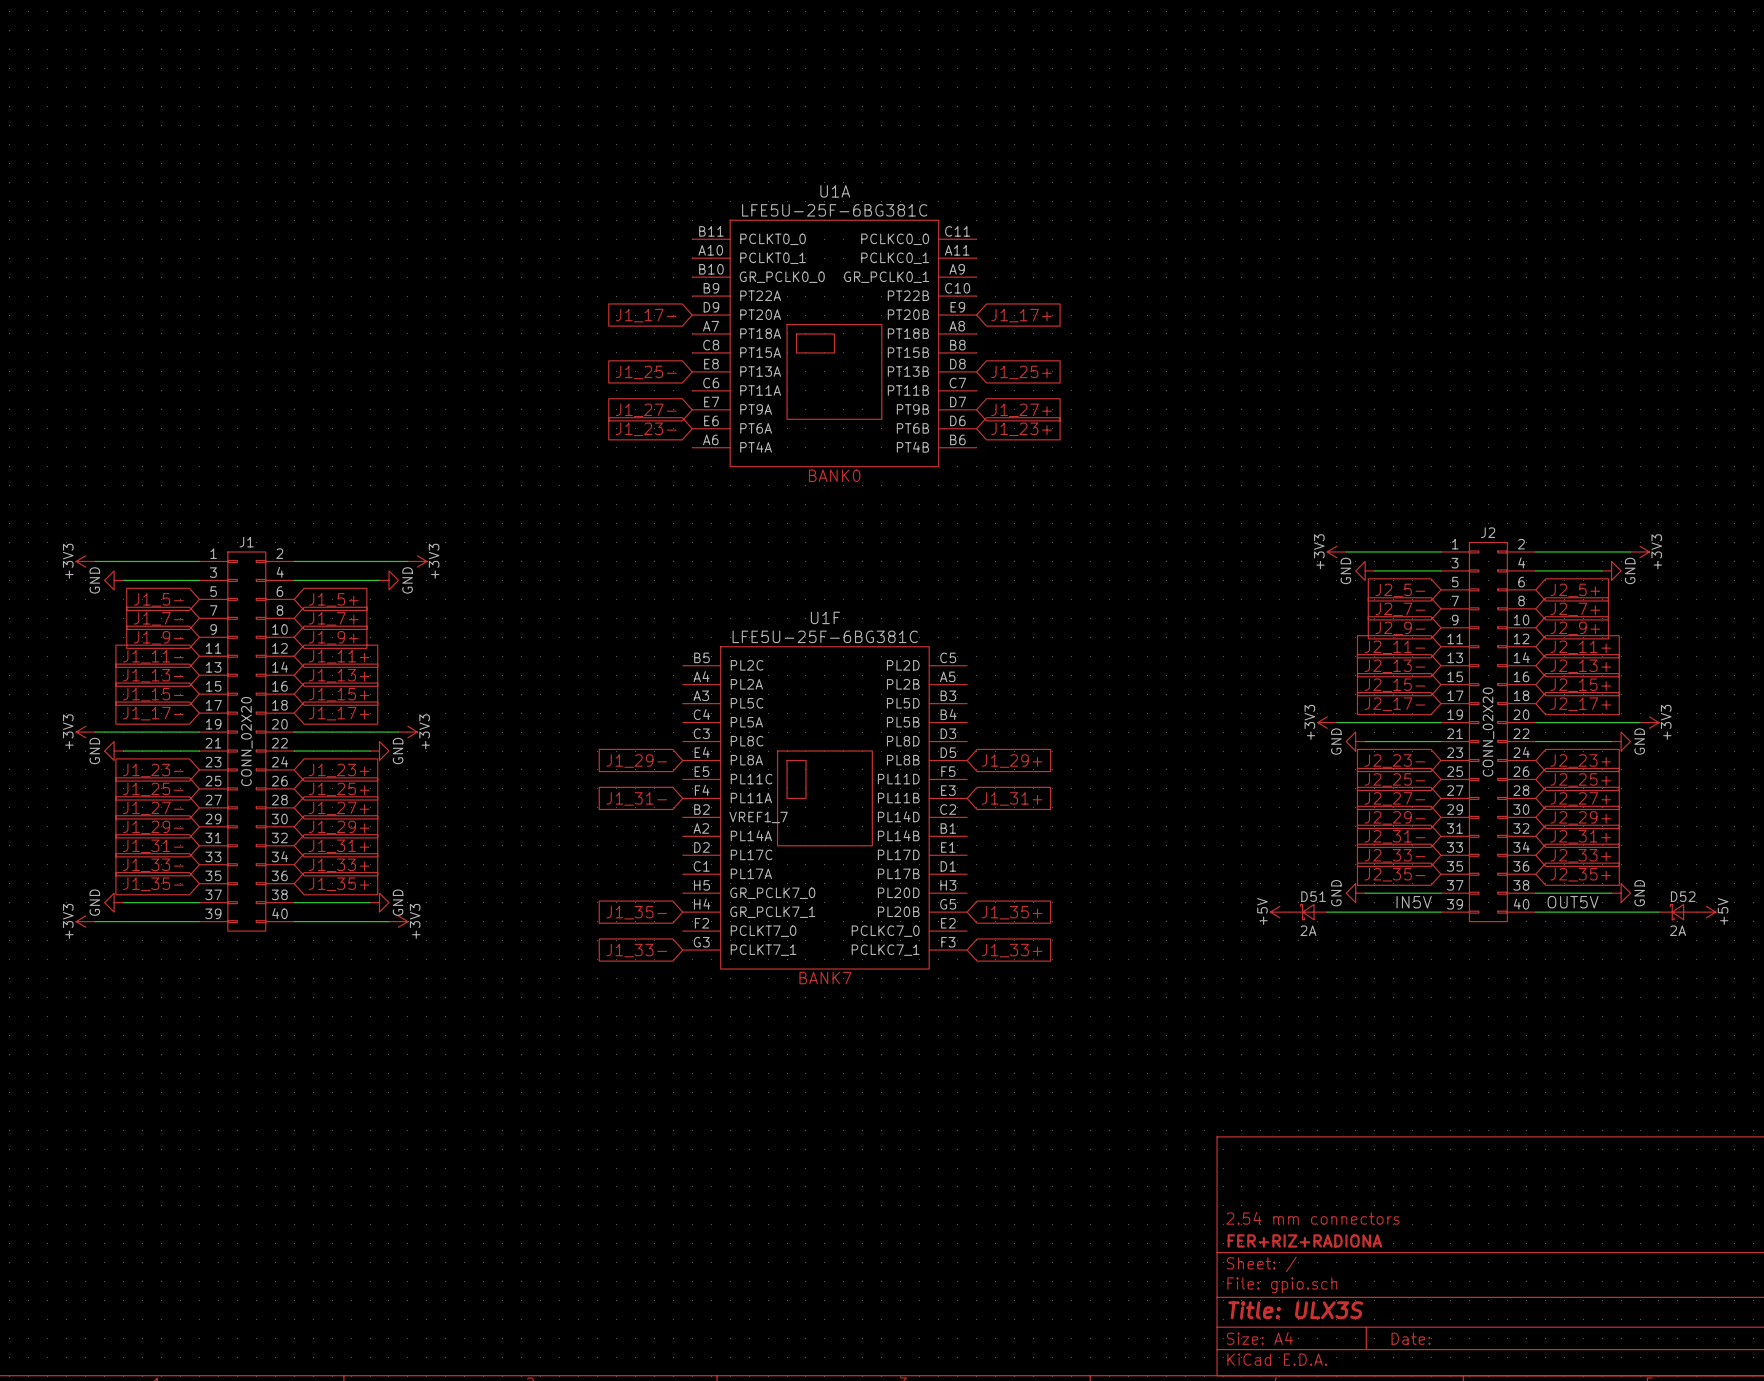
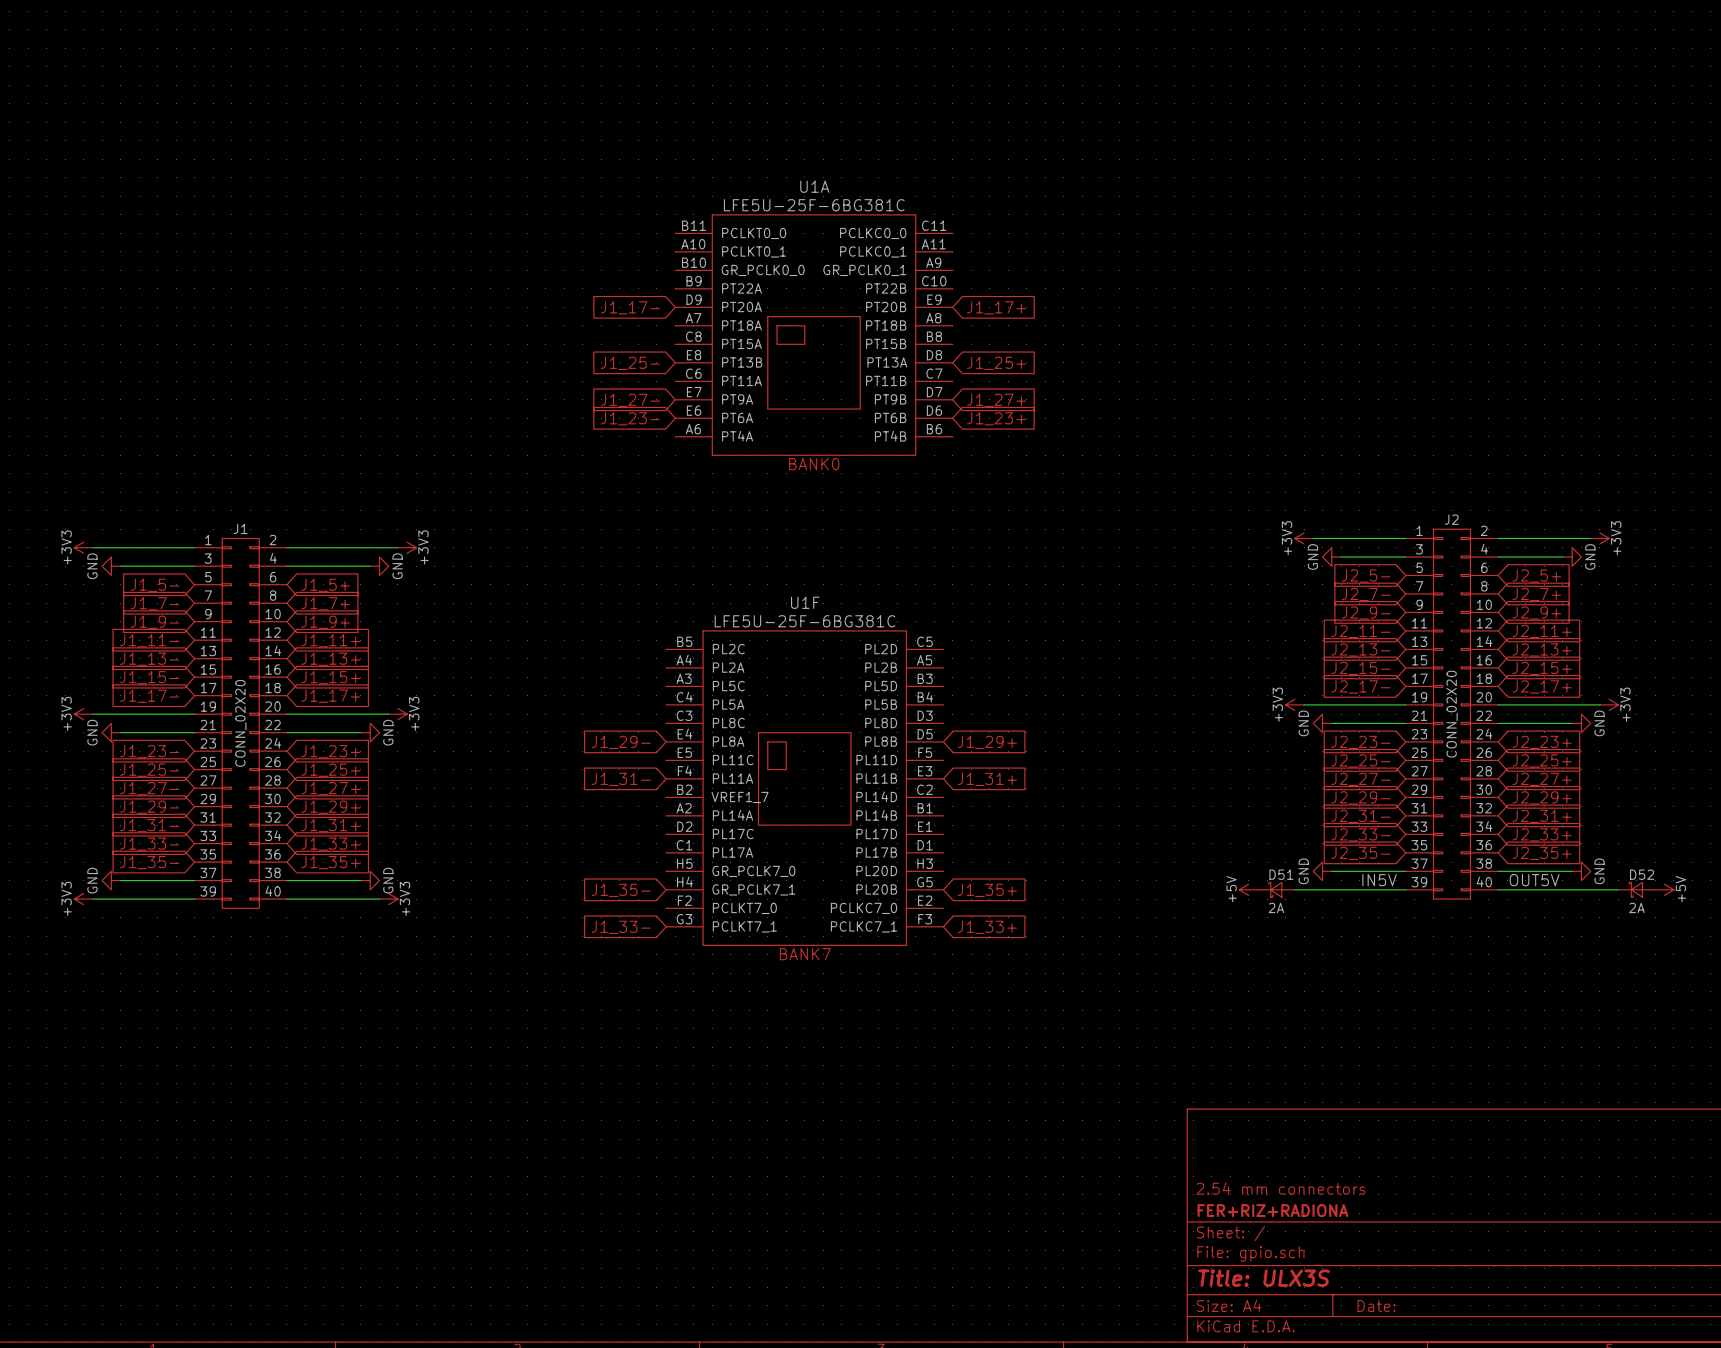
U1A symbol: [692, 220, 977, 467] -> [675, 214, 953, 456]
U1F symbol: [682, 646, 968, 970] -> [666, 630, 944, 946]

